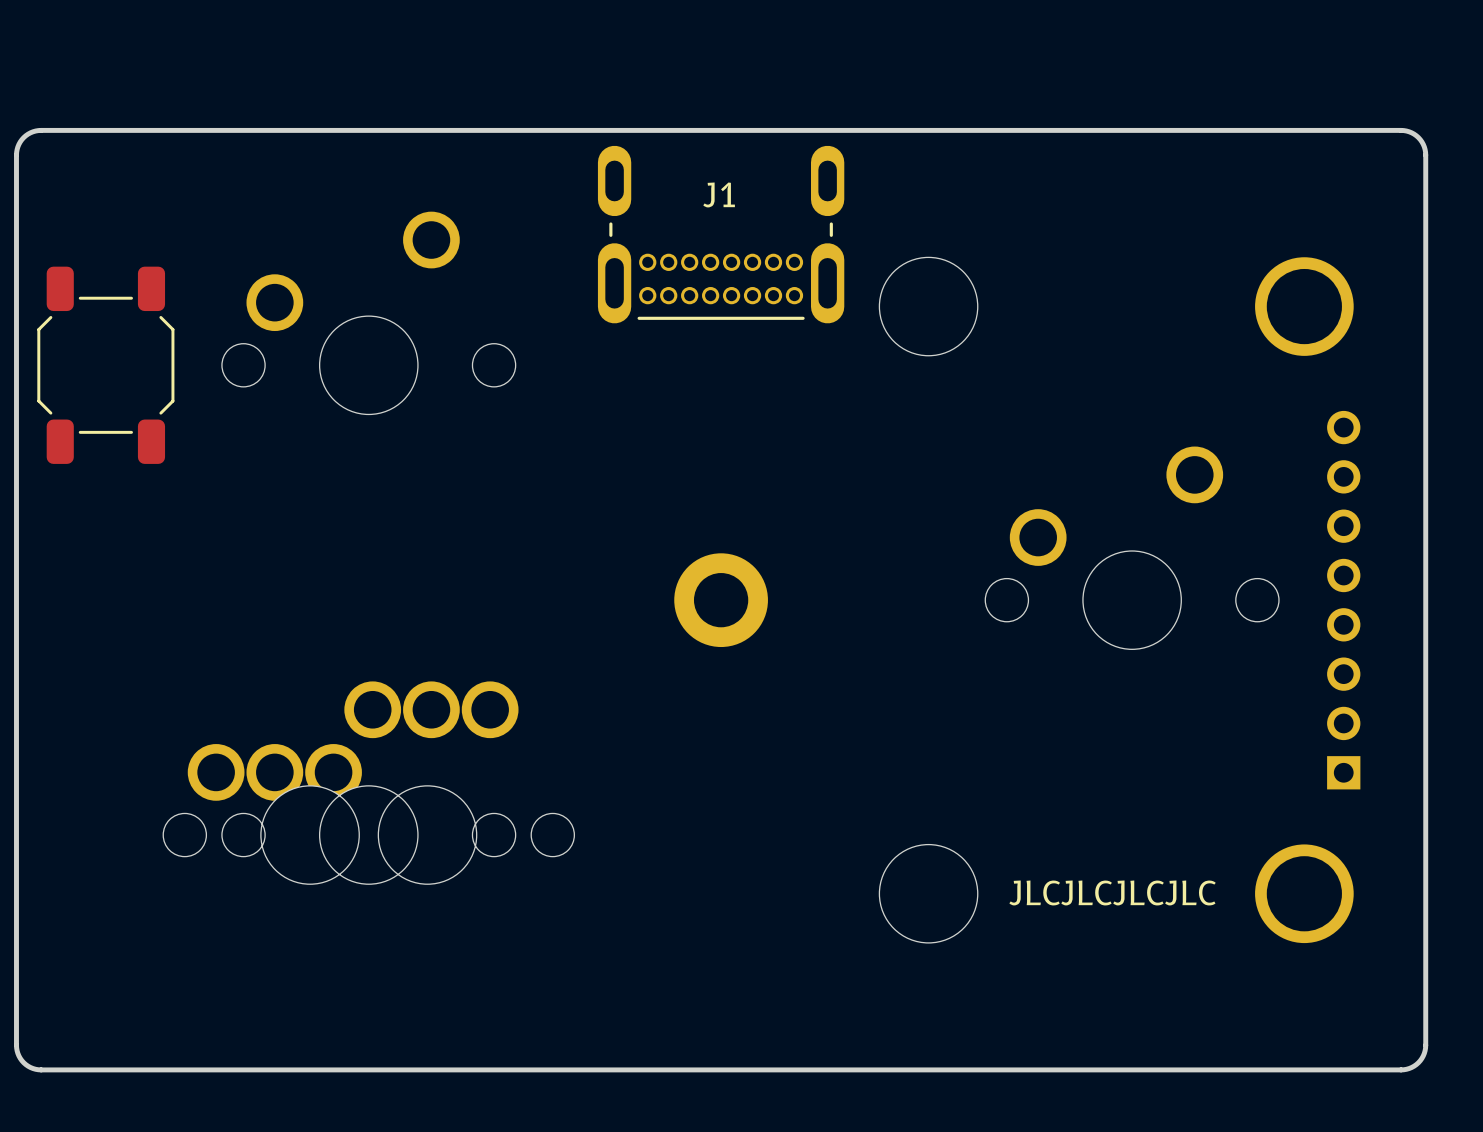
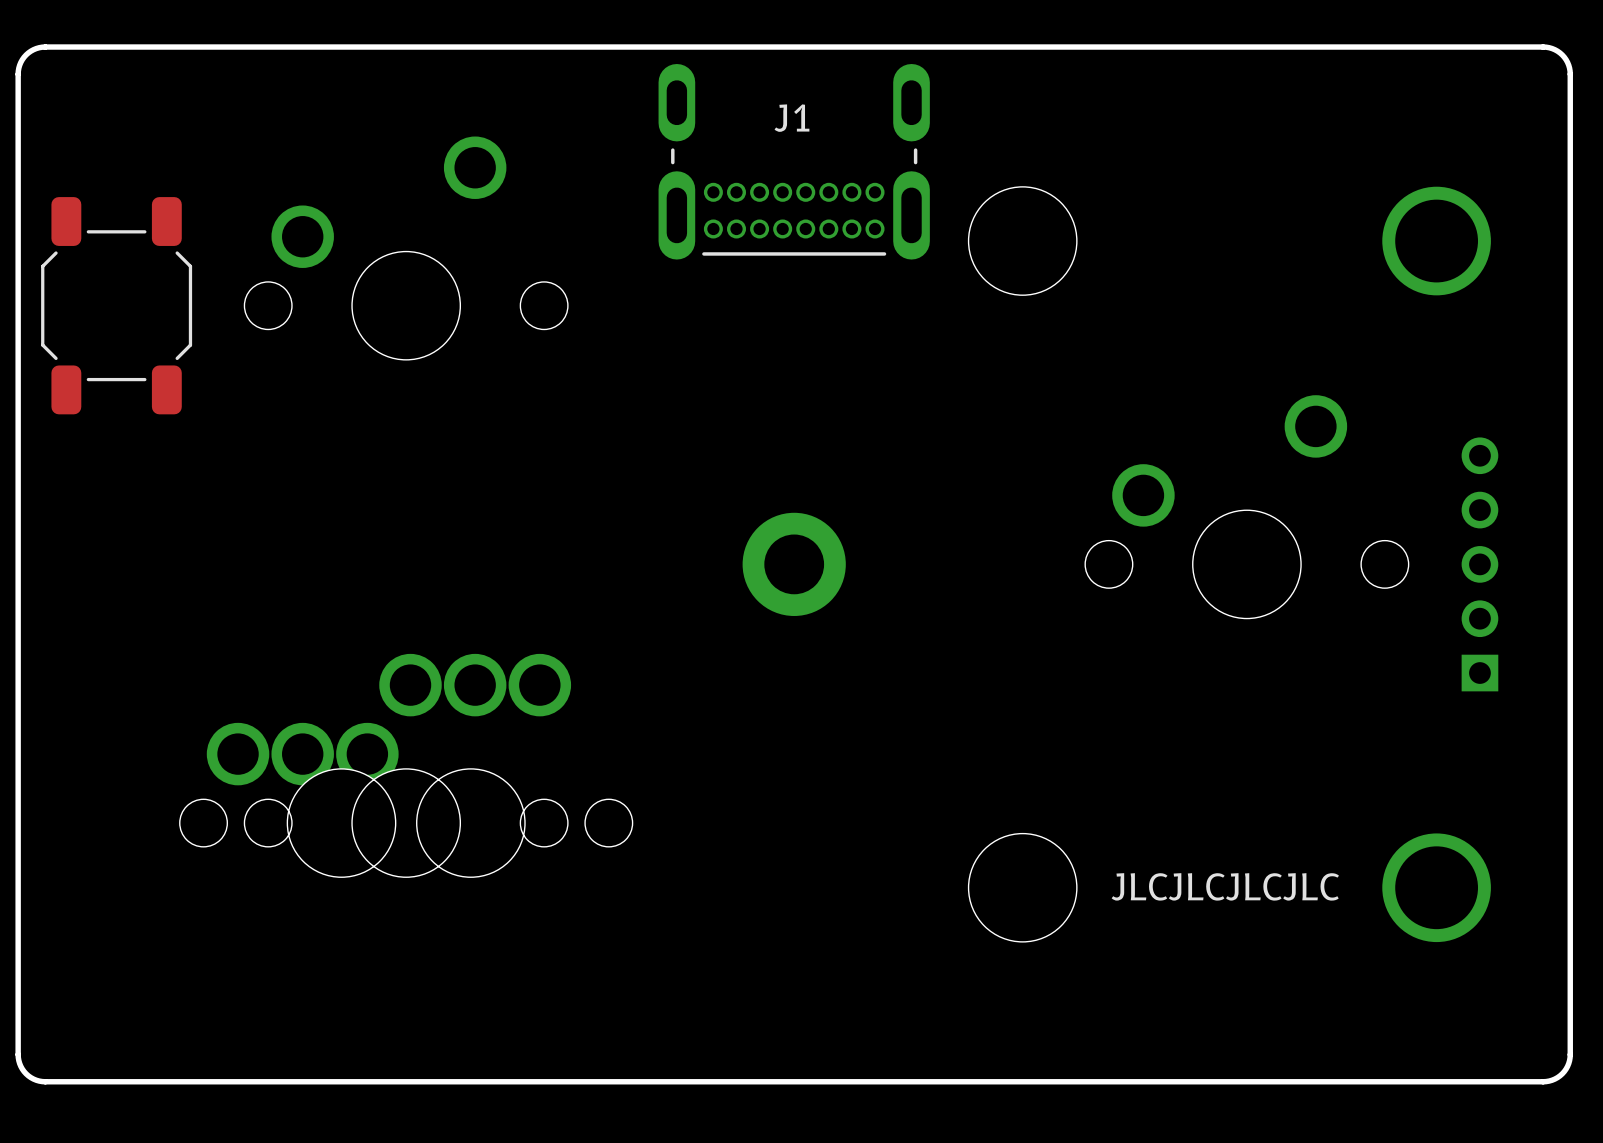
part footprint: [1327, 410, 1361, 790] -> [1461, 437, 1499, 692]

